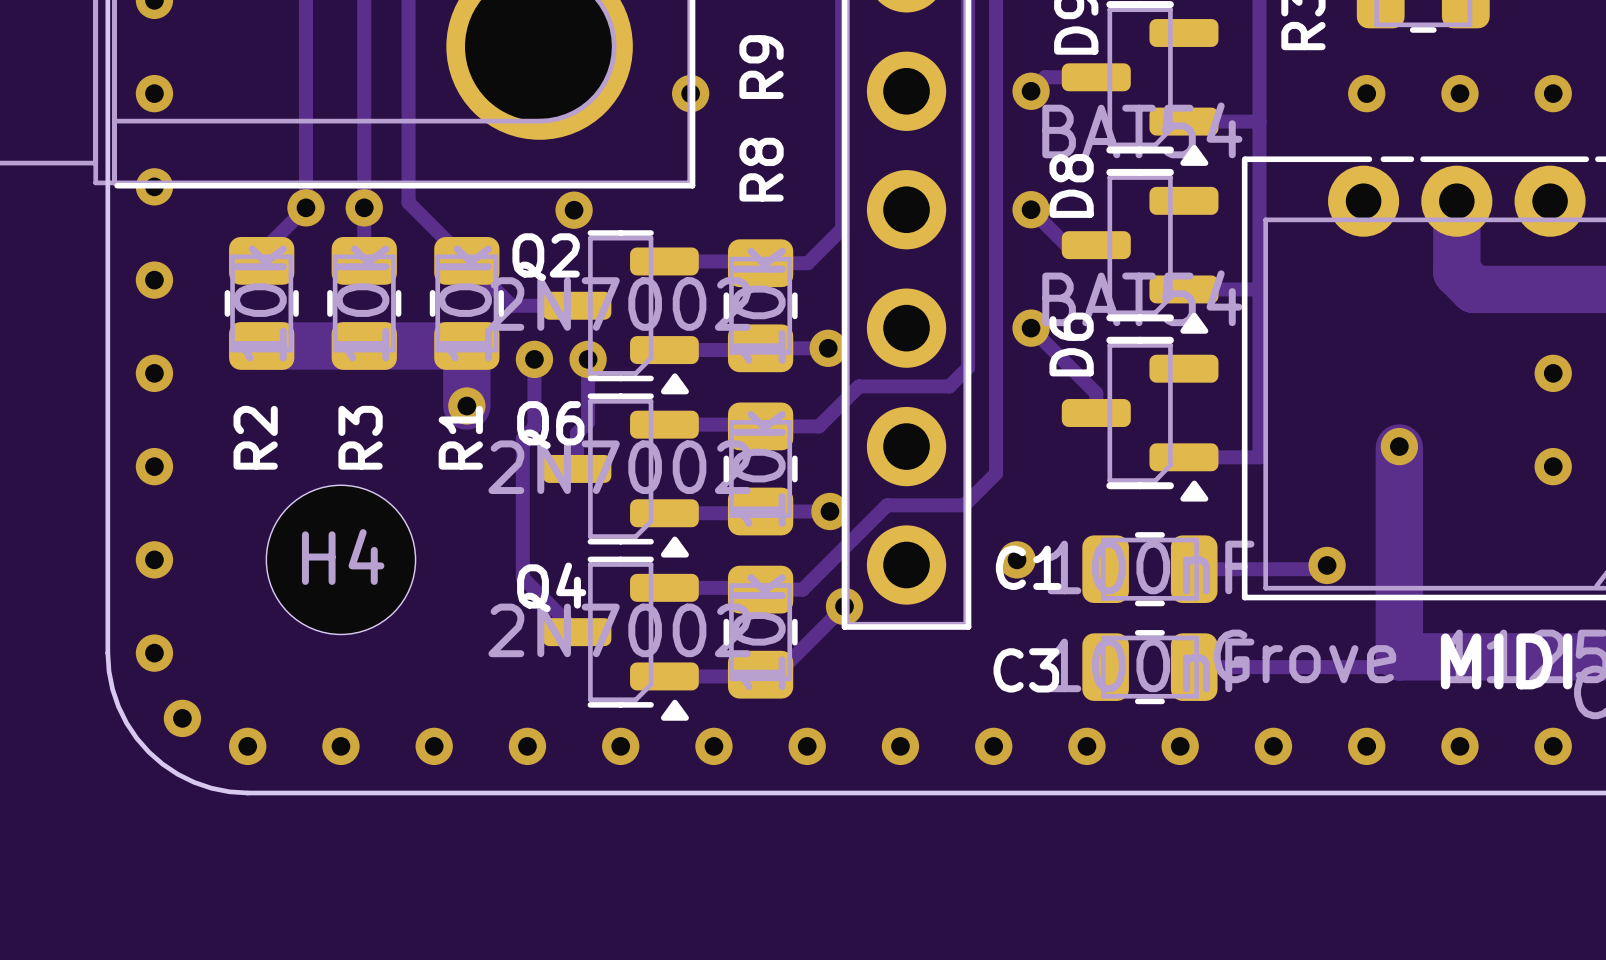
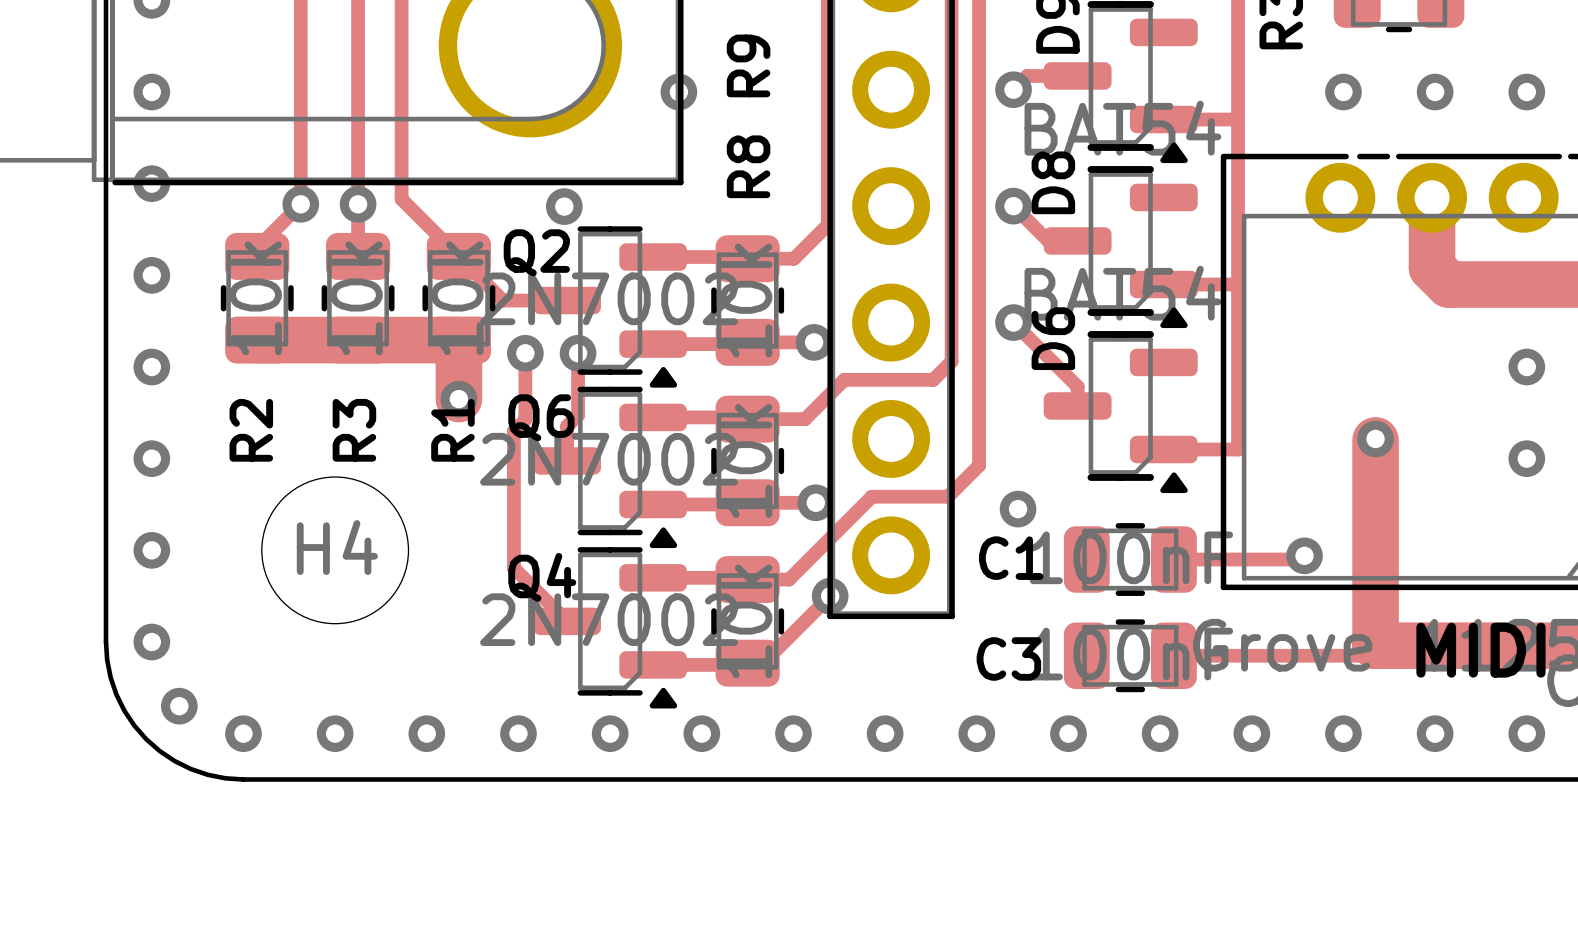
via position: (1017, 559) -> (1018, 509)

